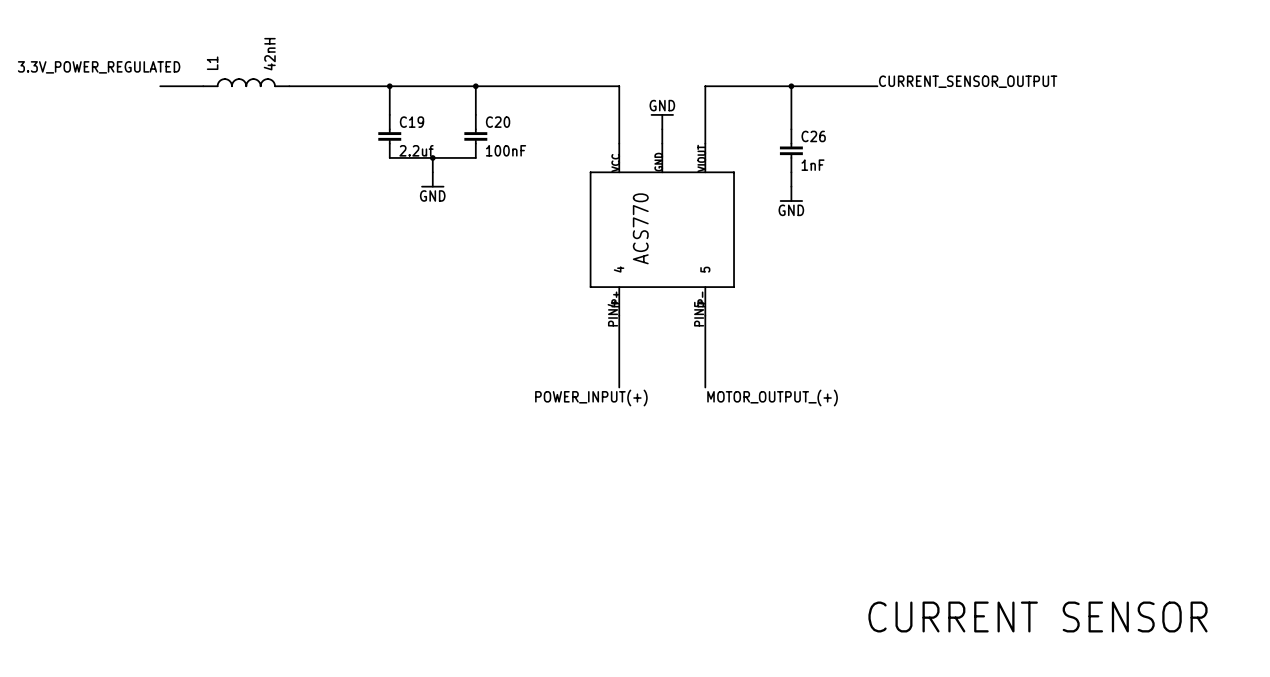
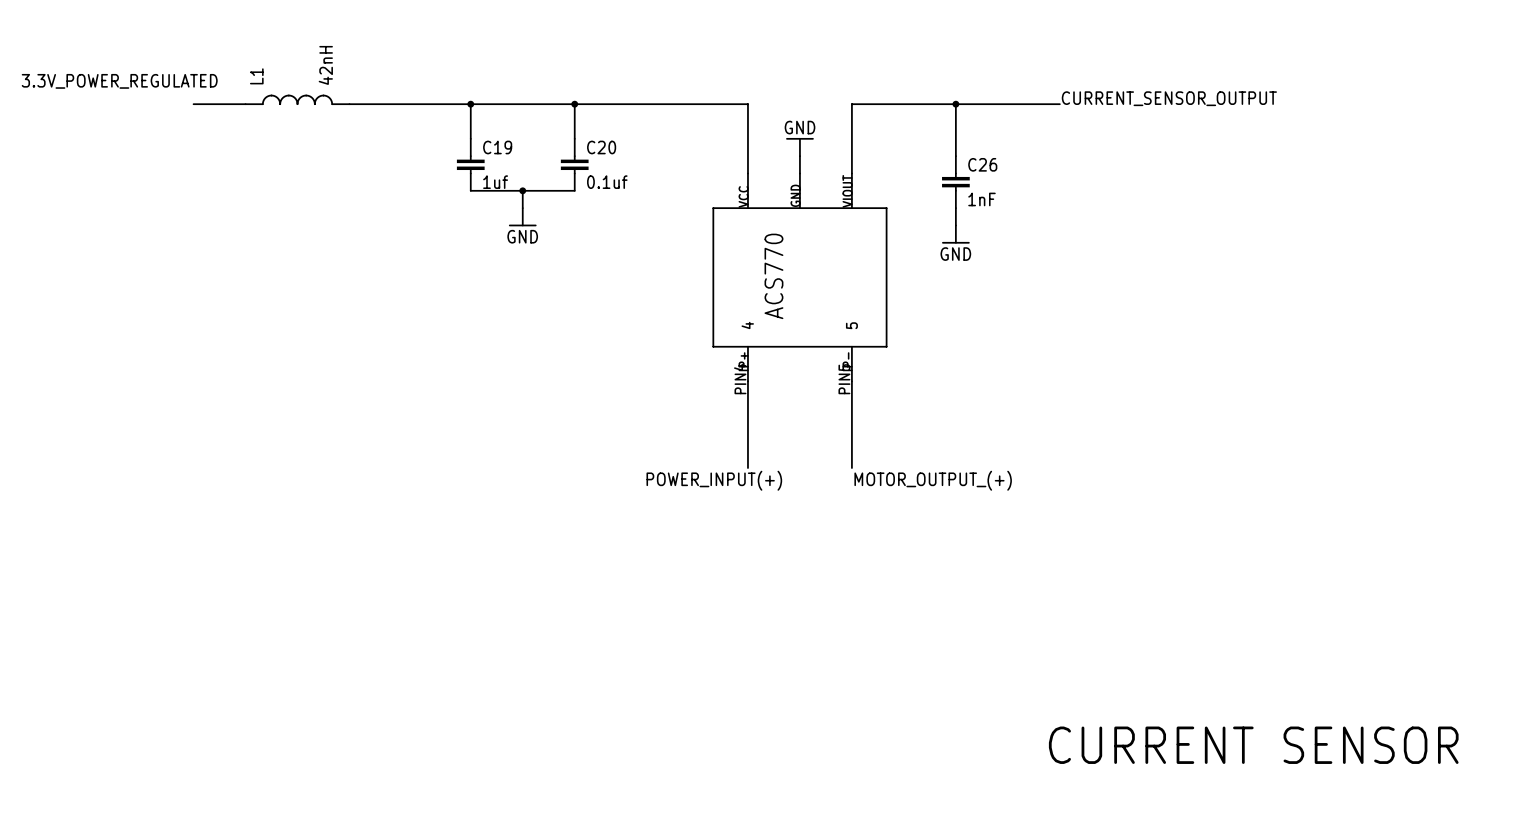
C19 value: 2.2uf (416, 150) -> 1uf (495, 182)
C20 value: 100nF (506, 150) -> 0.1uf (607, 182)

